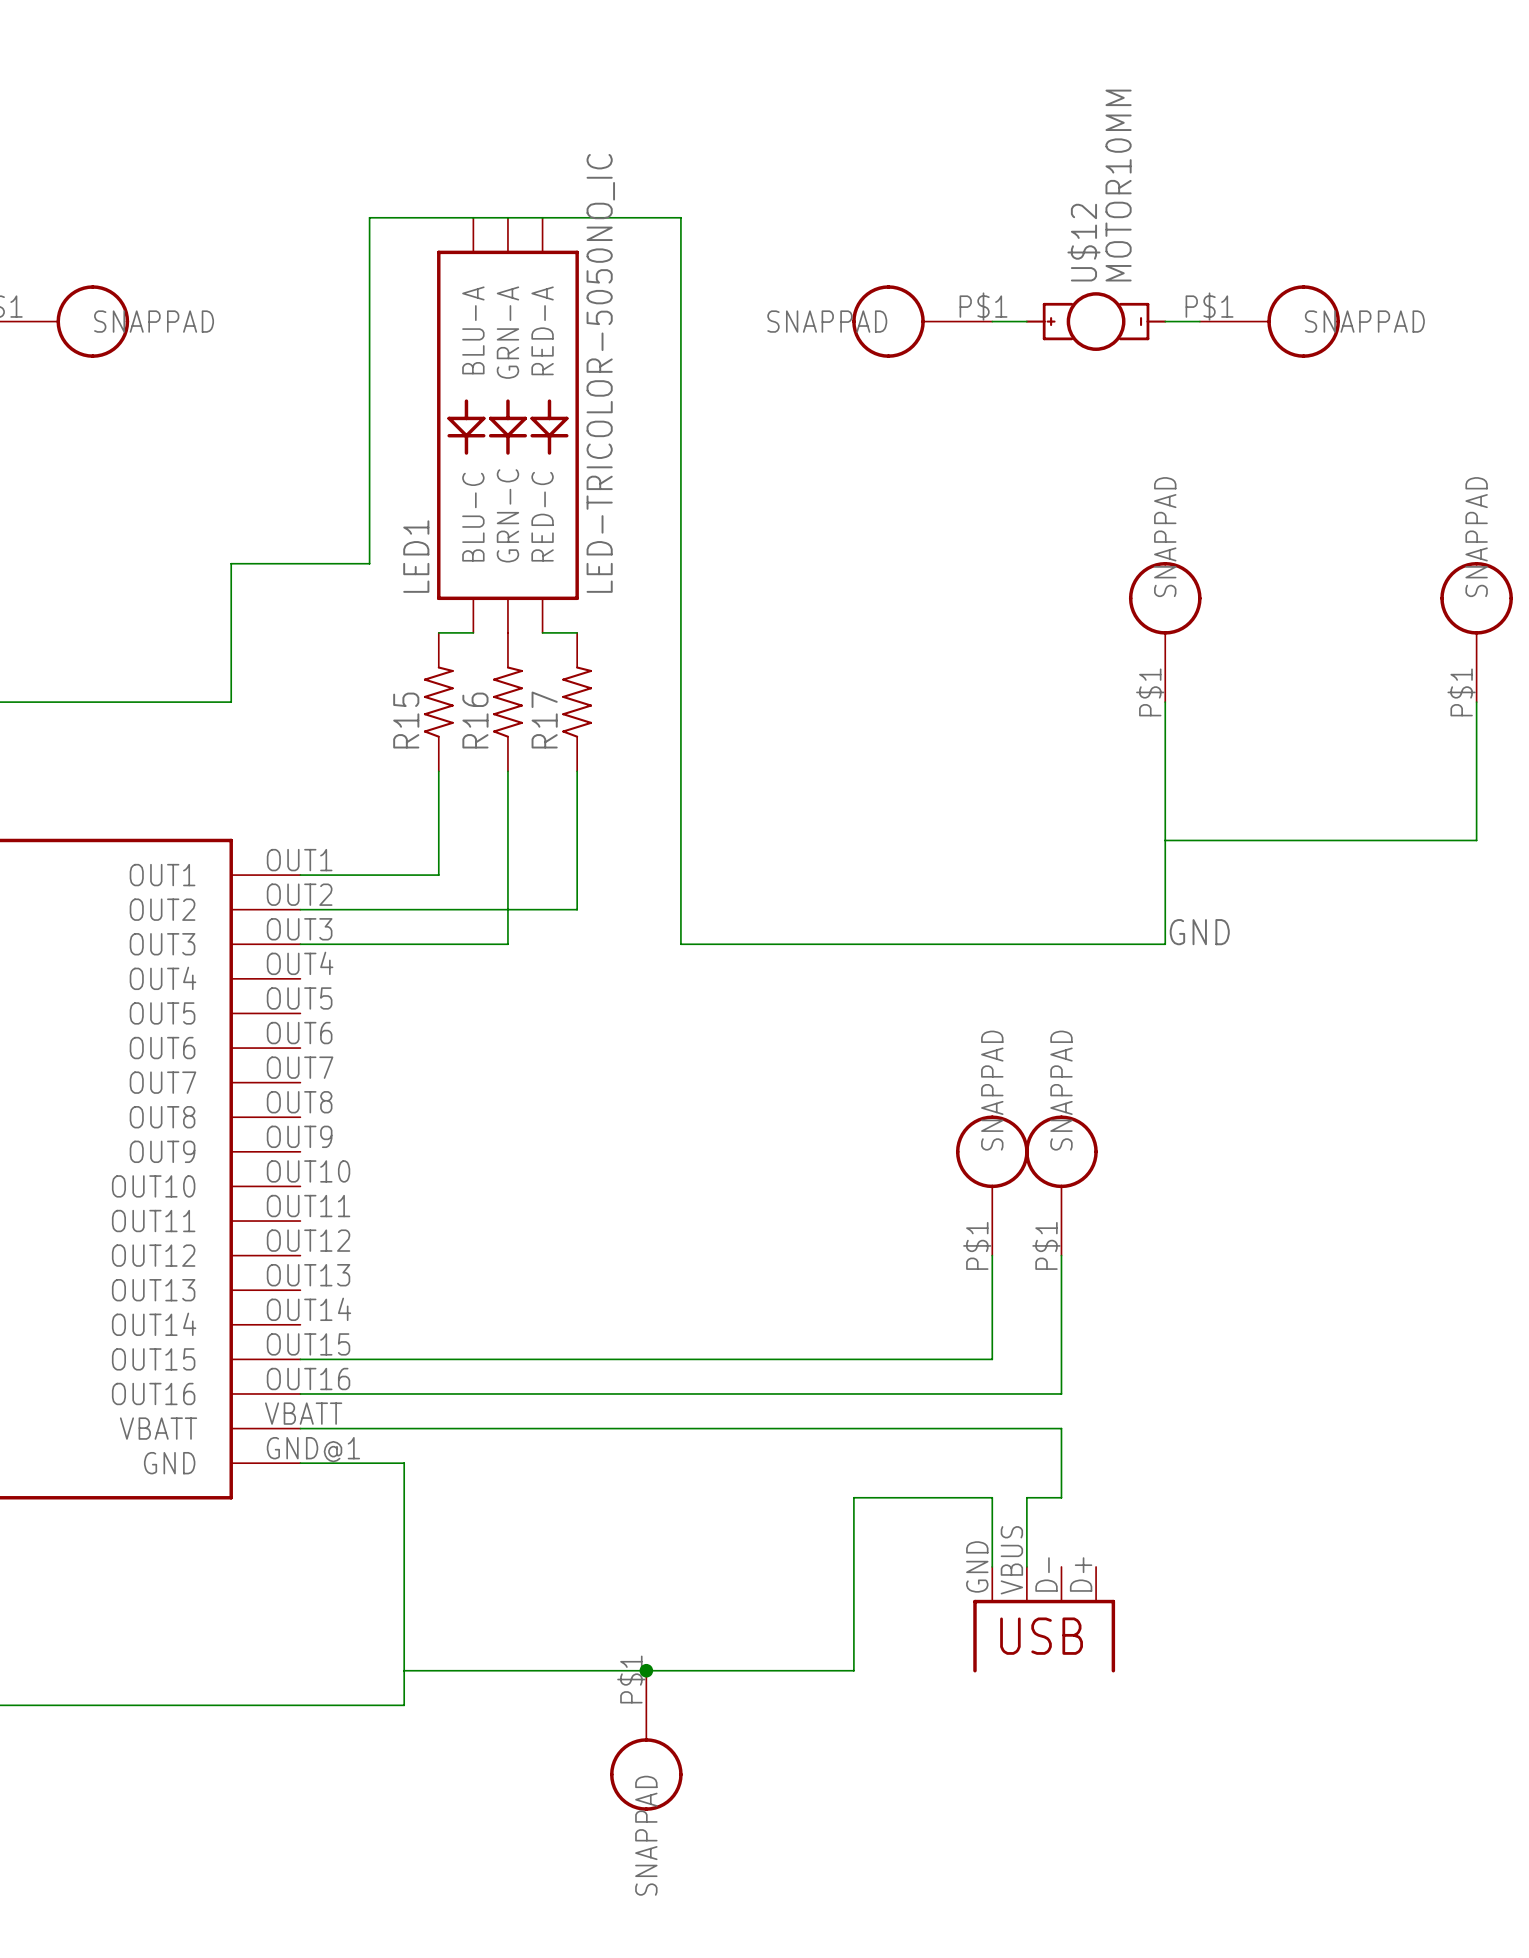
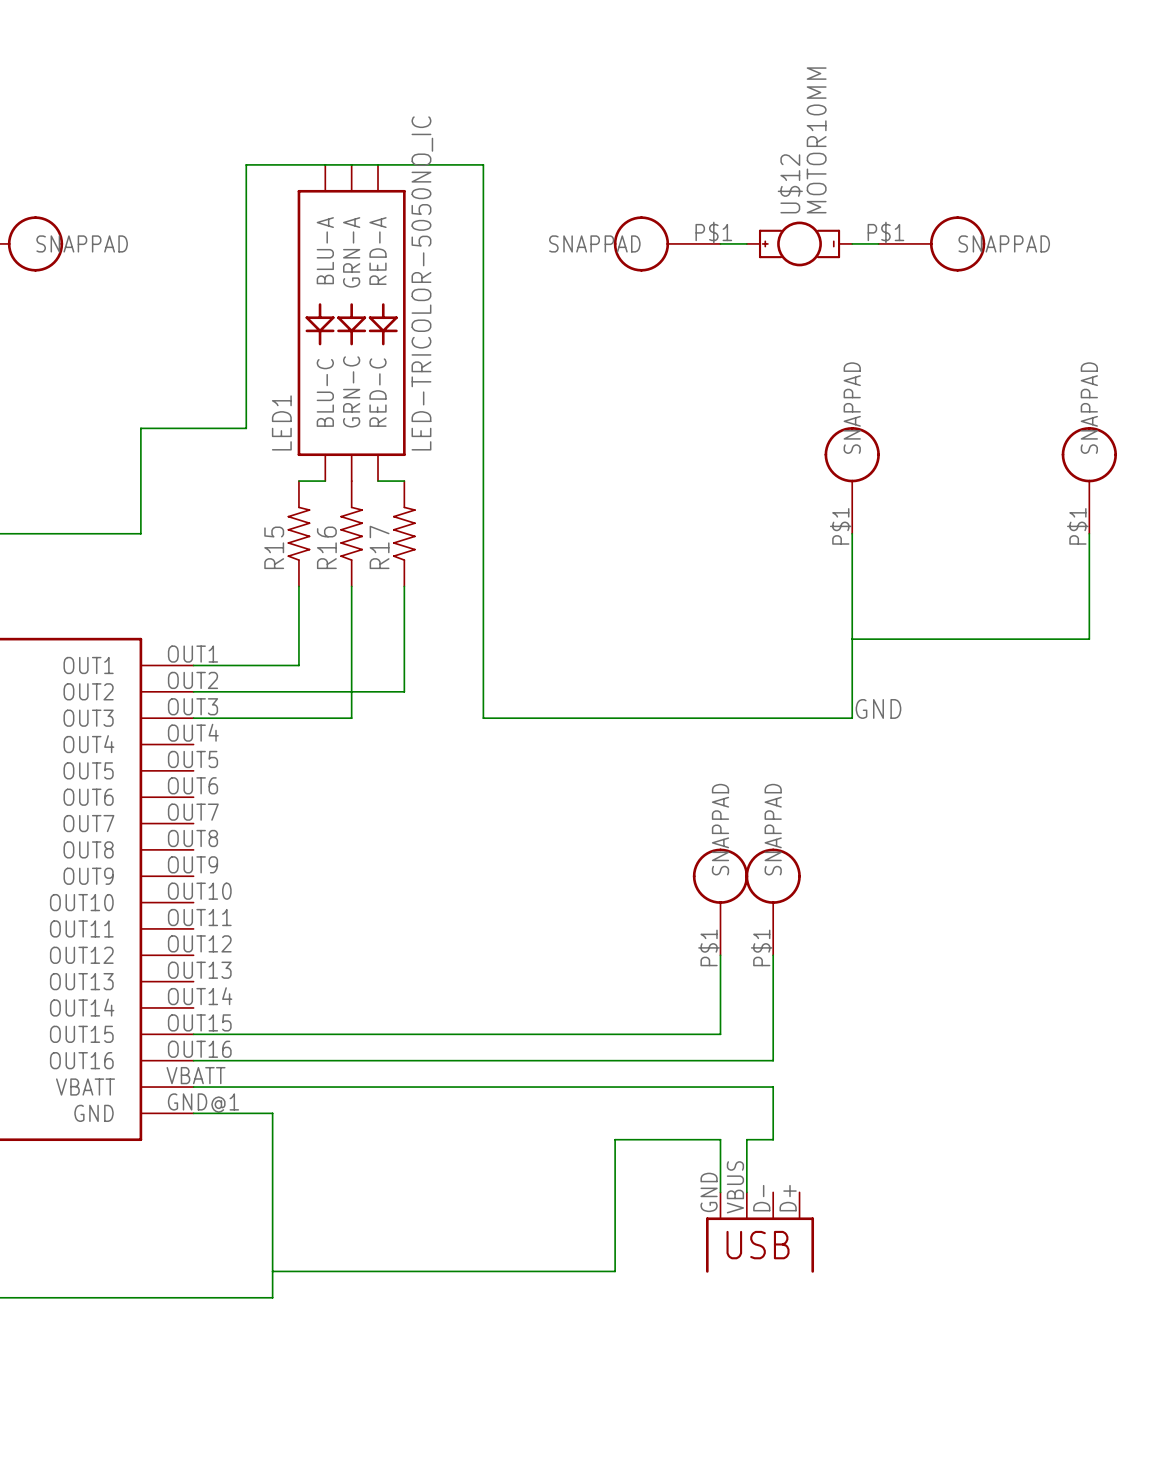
junction: (646, 1670) -> none
part: (646, 1740) -> none

